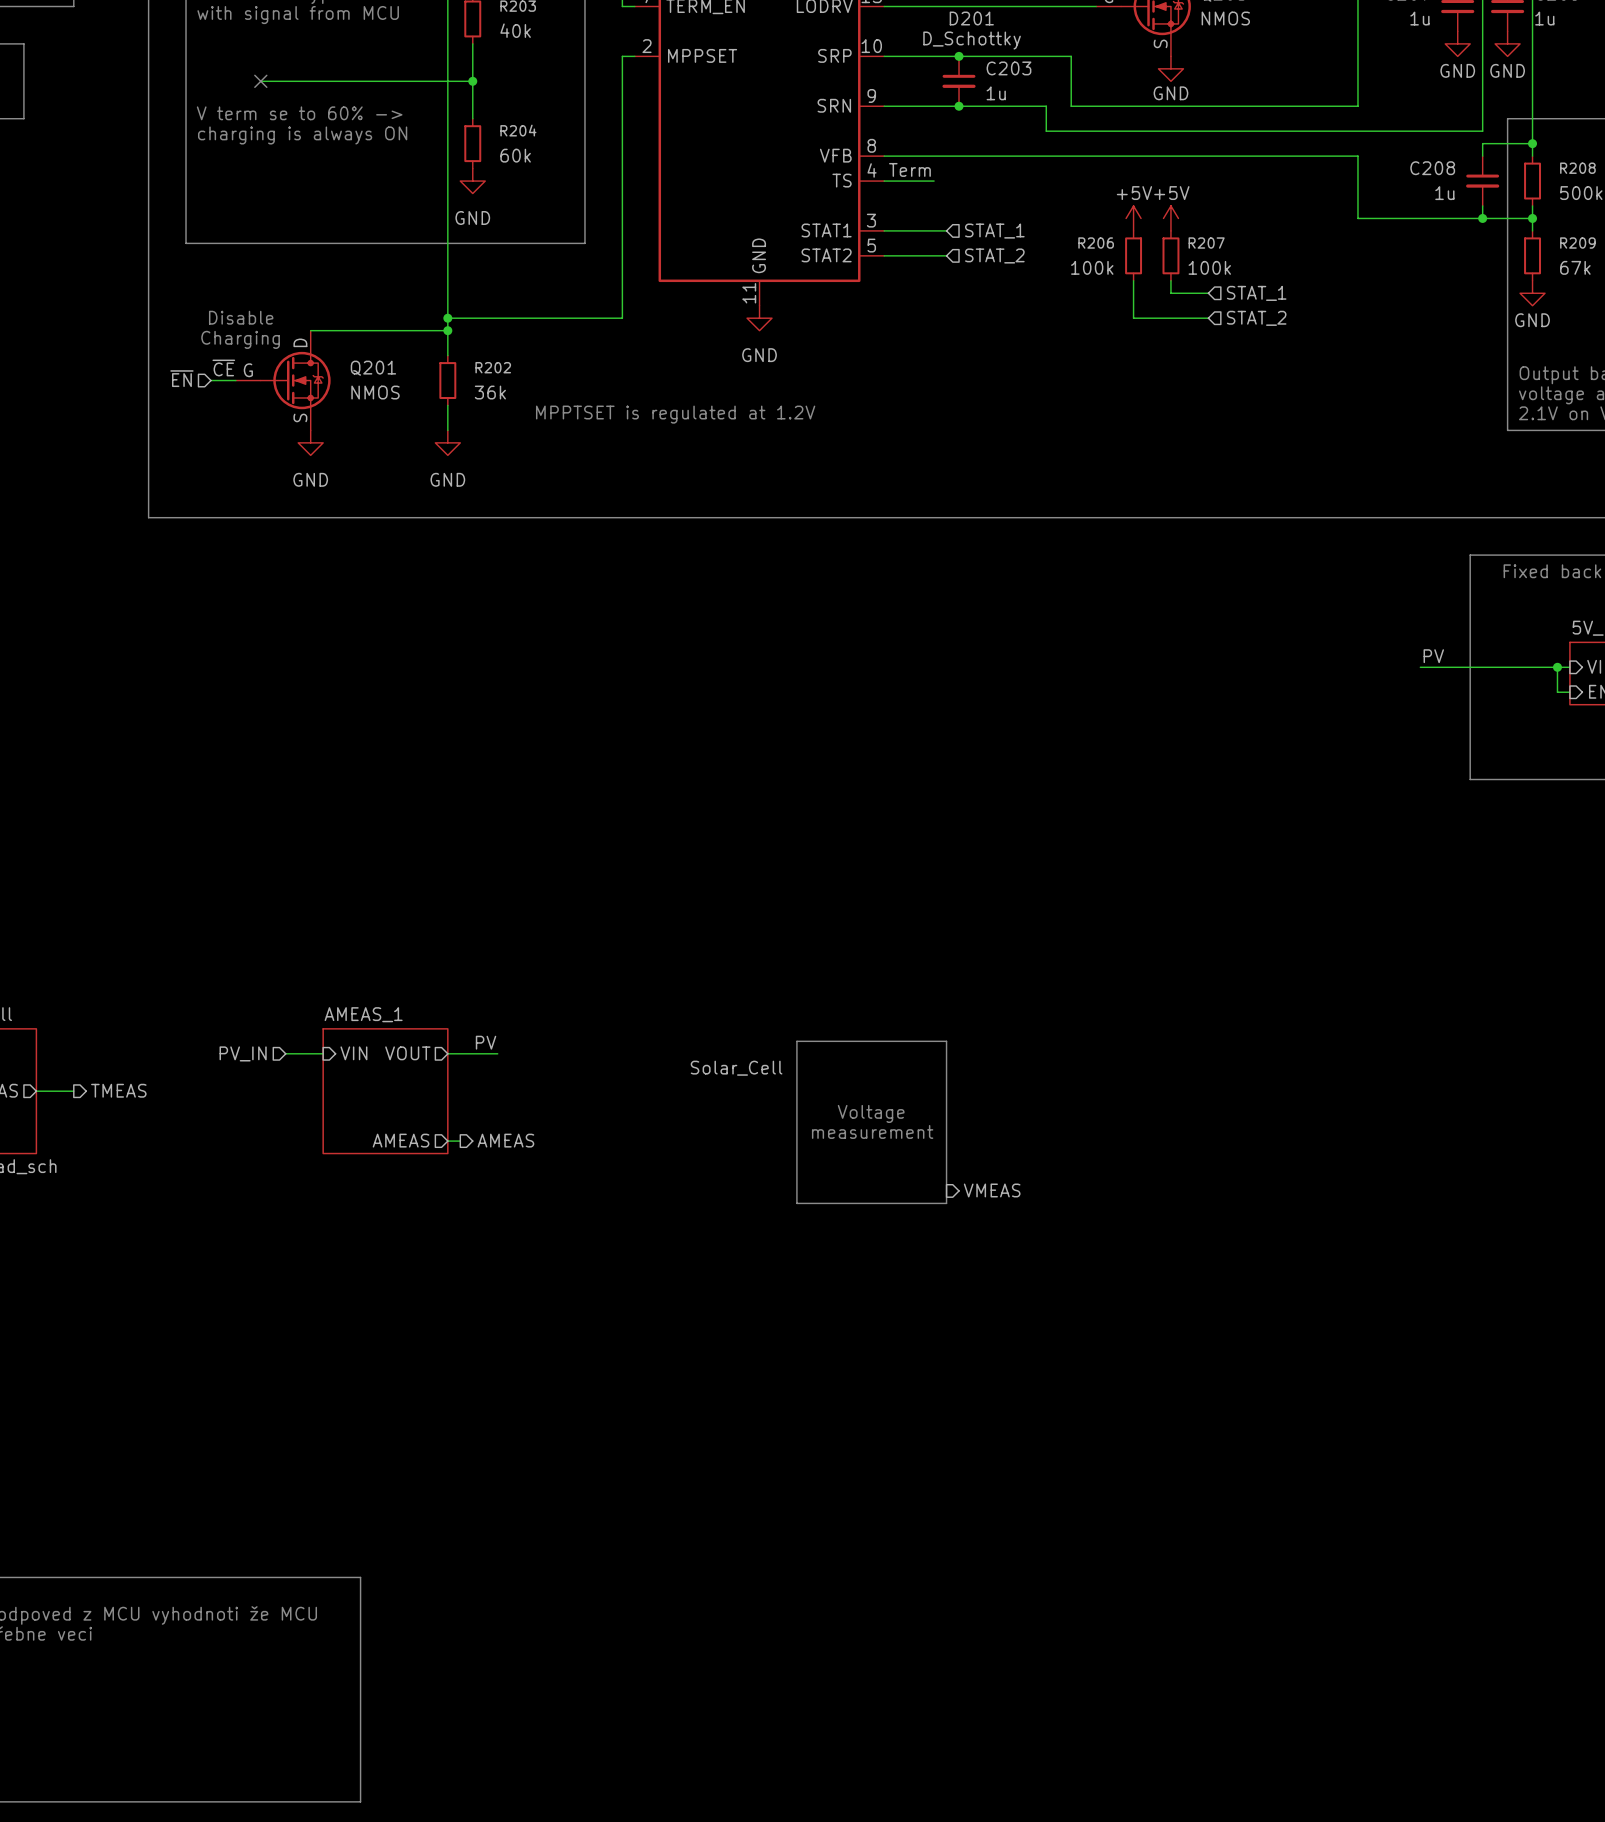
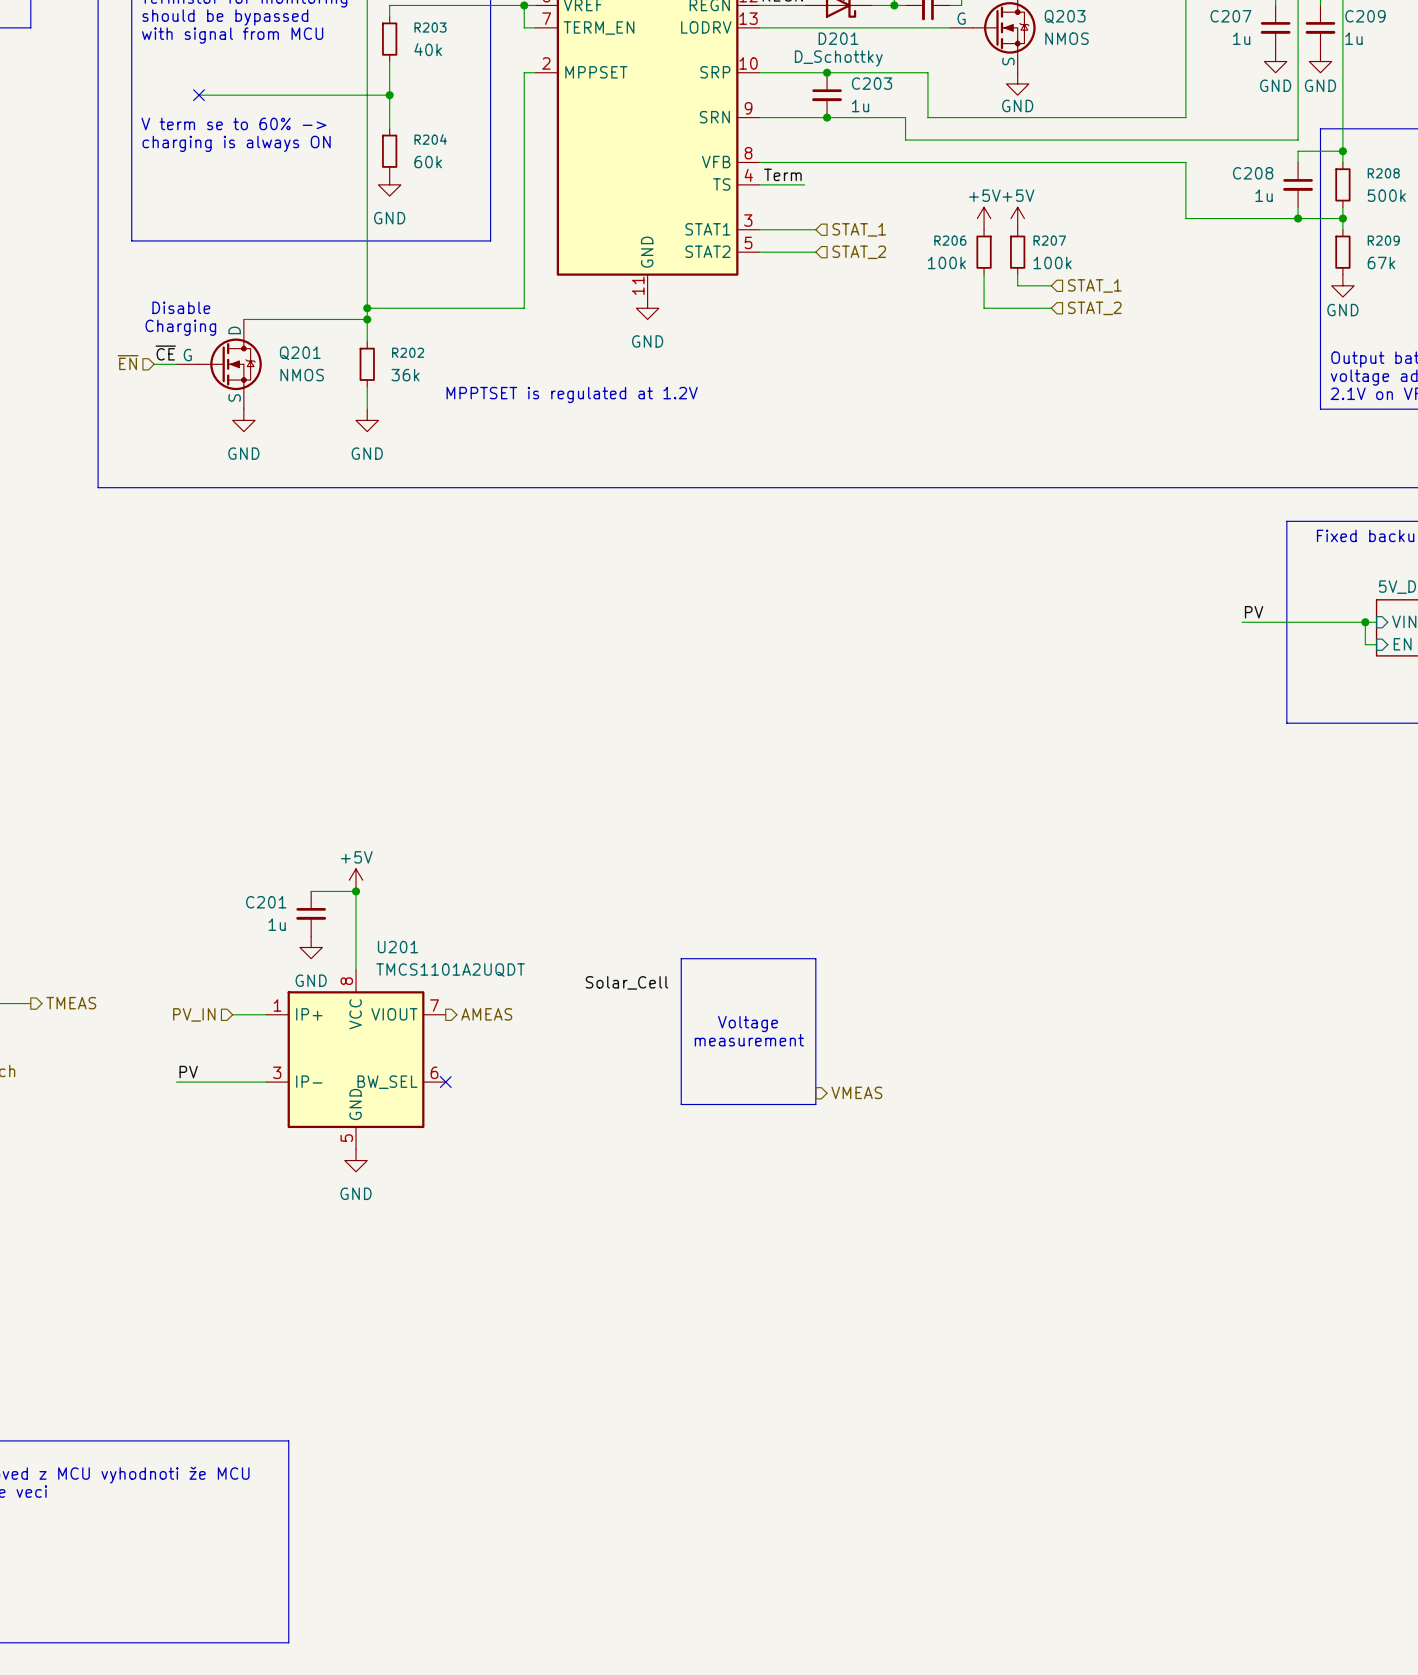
power symbol: none -> +5V (356, 880)
wire: none -> (311, 891) (356, 891) (356, 969)
junction: none -> (356, 891)
C201: none -> 1u (311, 913)
power symbol: none -> GND (311, 947)
label: PV (486, 1042) -> none
hierarchical label position: PV_IN (243, 1053) -> PV_IN (194, 1014)
wire: (285, 1053) (323, 1053) -> (232, 1014) (266, 1014)
sheet pin: VIN (353, 1053) -> none
sheet pin: VOUT (407, 1053) -> none
wire: (447, 1053) (497, 1053) -> none
sheet AMEAS_1: (385, 1091) -> none
sheet pin: AMEAS (401, 1140) -> none
hierarchical label position: AMEAS (505, 1140) -> AMEAS (486, 1014)
U201: none -> TMCS1101A2UQDT (356, 1059)
label: none -> PV (188, 1072)
wire: none -> (176, 1082) (266, 1082)
no-connect mark: none -> (445, 1082)
power symbol: none -> GND (356, 1160)

